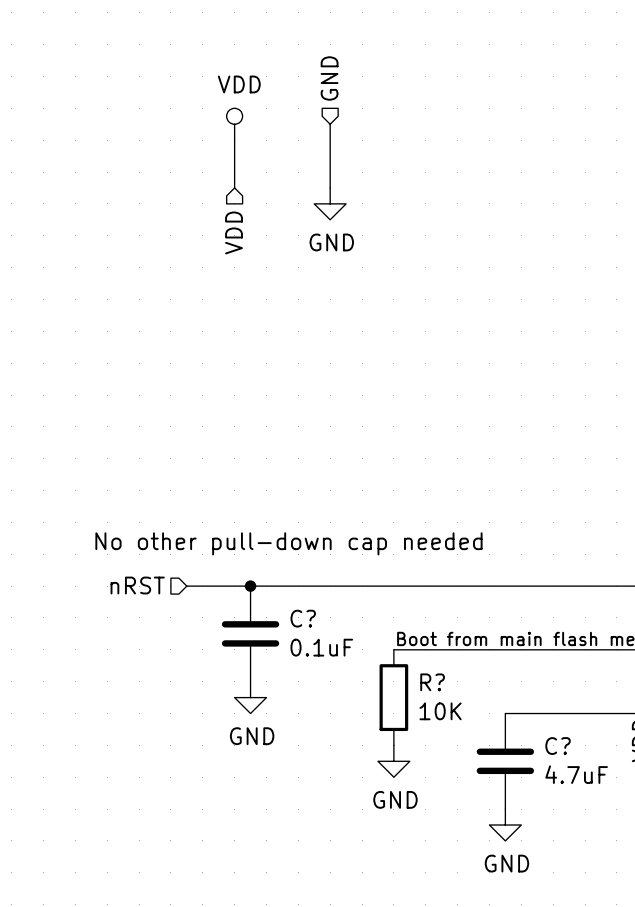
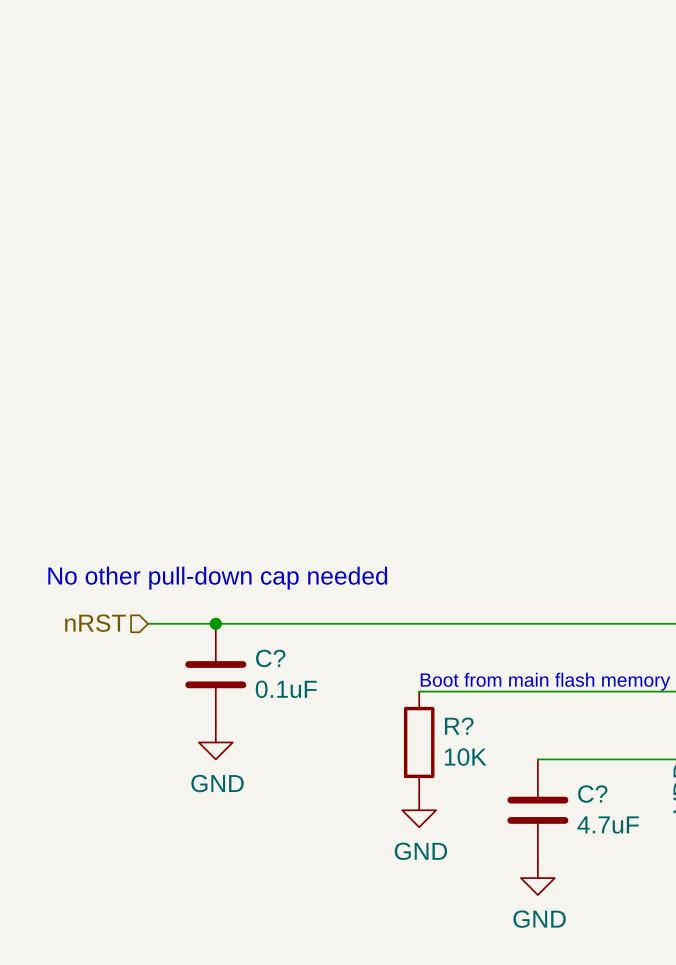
hierarchical label: GND (329, 78) -> none
power symbol: VDD (234, 124) -> none
wire: (330, 124) (330, 187) -> none
wire: (234, 140) (234, 187) -> none
power symbol: GND (330, 203) -> none
hierarchical label: VDD (234, 232) -> none
text position: No other pull-down cap needed (288, 543) -> No other pull-down cap needed (217, 578)
hierarchical label position: nRST (137, 585) -> nRST (95, 623)
wire: none -> (148, 623) (198, 623)
junction position: (250, 586) -> (215, 623)
C? position: (250, 633) -> (215, 674)
power symbol position: GND (250, 697) -> GND (215, 742)

